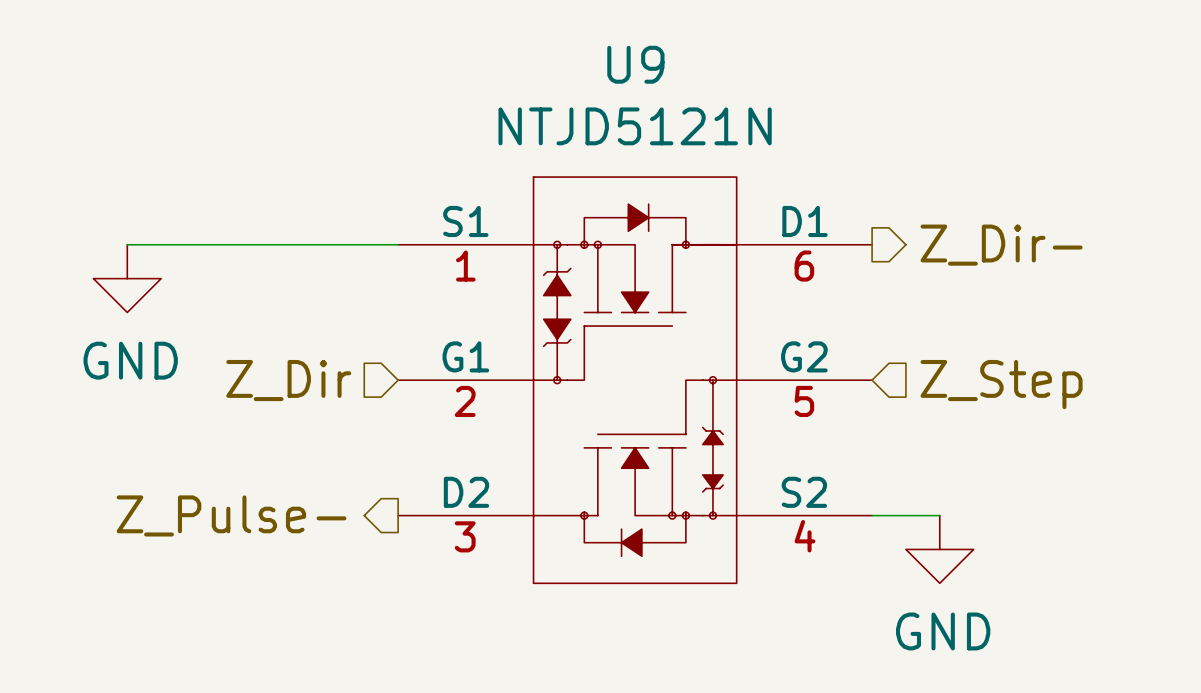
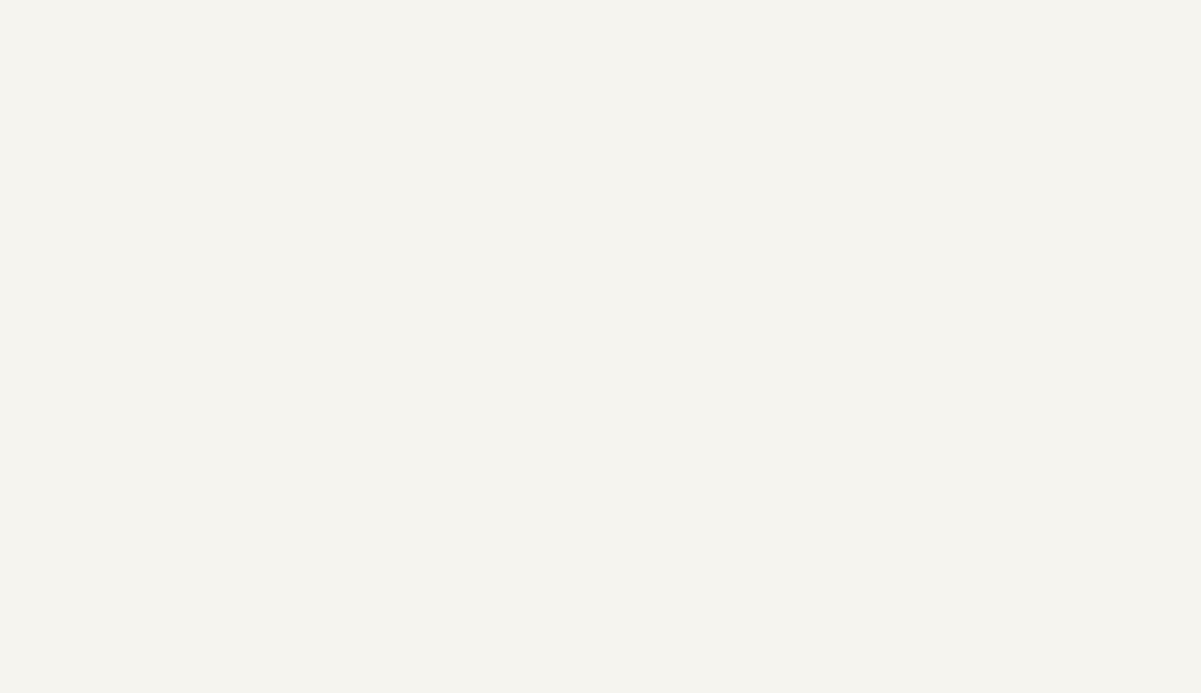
wire: (127, 244) (398, 244) -> none
hierarchical label: Z_Dir- (1001, 245) -> none
power symbol: GND (127, 278) -> none
hierarchical label: Z_Dir (288, 380) -> none
U9: NTJD5121N (635, 380) -> none
hierarchical label: Z_Step (1001, 384) -> none
hierarchical label: Z_Pulse- (231, 515) -> none
wire: (872, 515) (939, 515) -> none
power symbol: GND (939, 549) -> none

